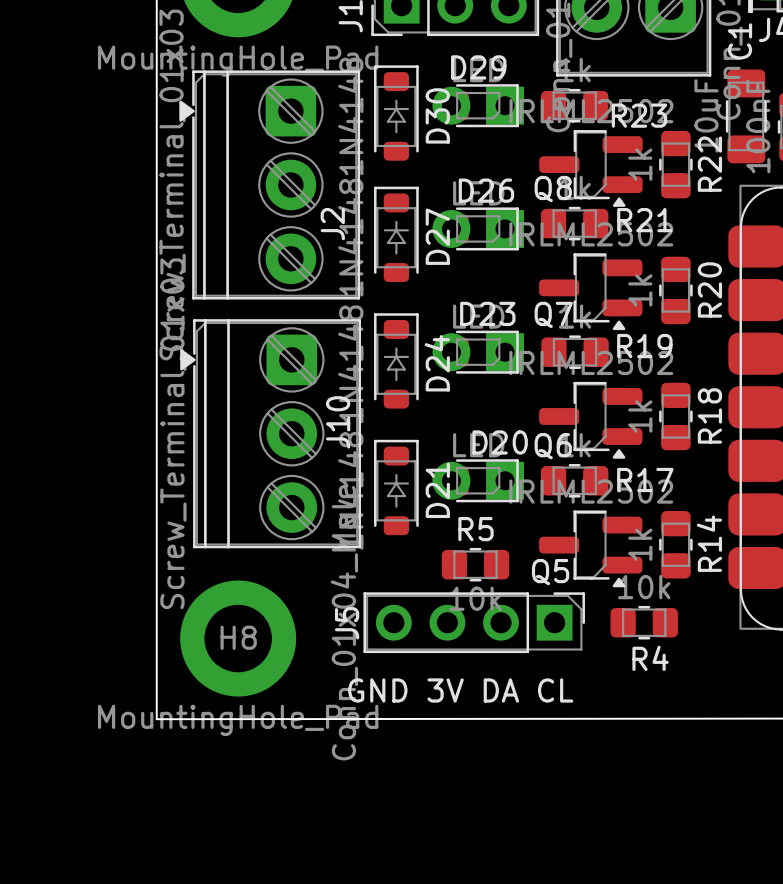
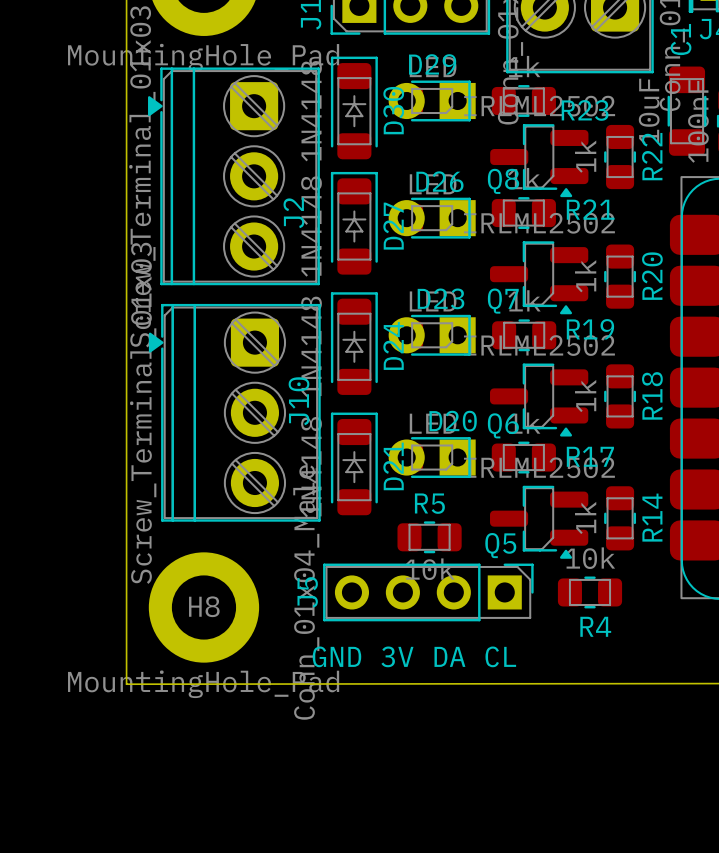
D30 footprint: [374, 65, 419, 161] -> [330, 56, 378, 160]
D27 footprint: [374, 186, 419, 283] -> [330, 171, 378, 275]
D24 footprint: [374, 313, 419, 409] -> [330, 292, 378, 395]
D21 footprint: [374, 439, 419, 536] -> [330, 412, 378, 516]

